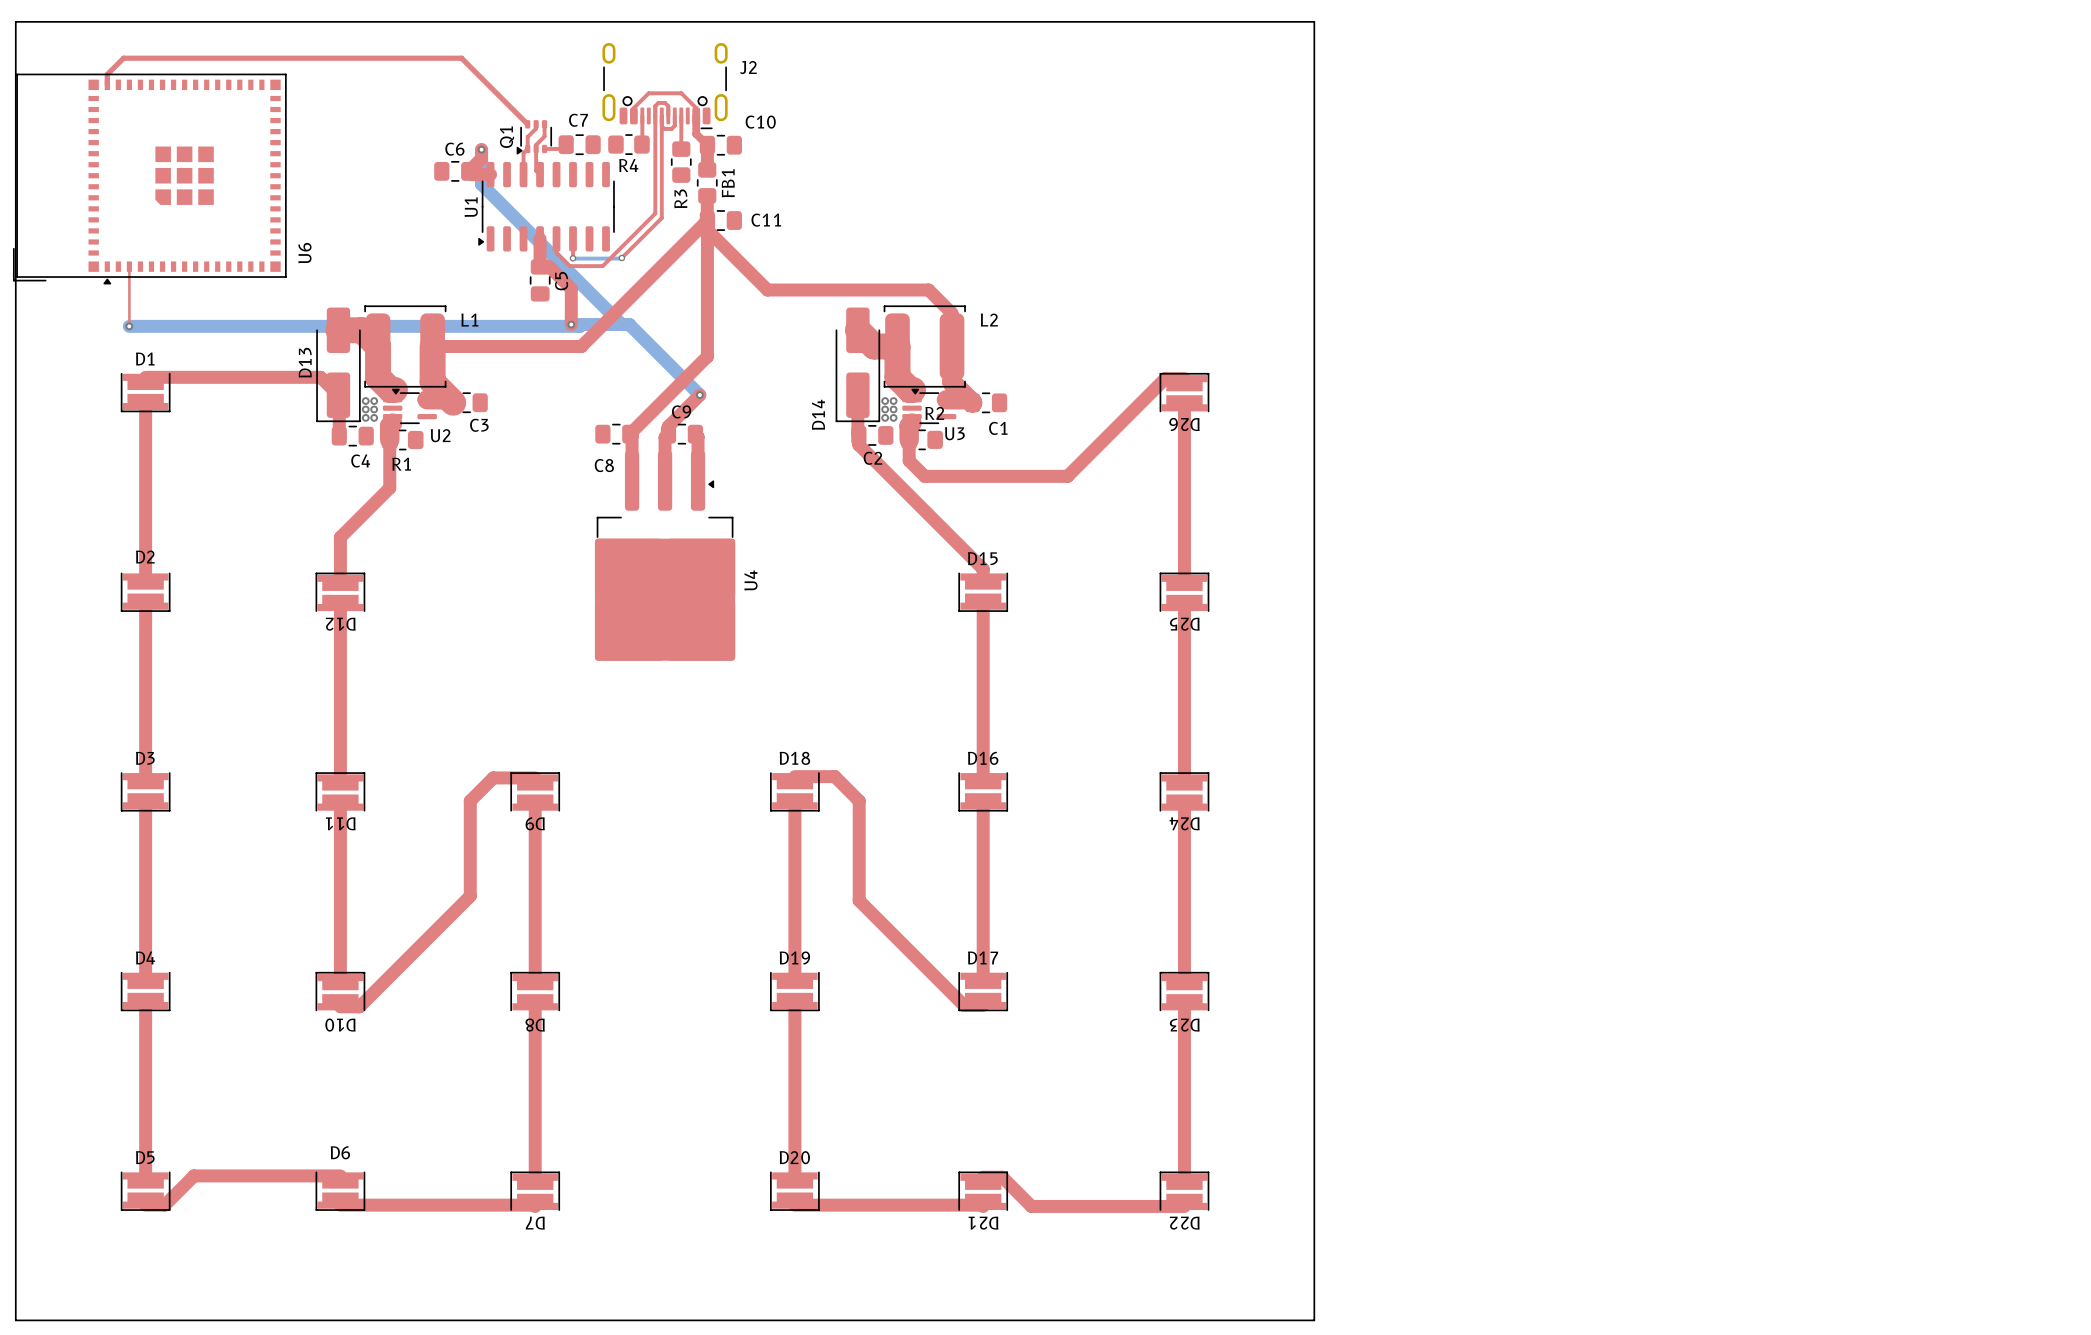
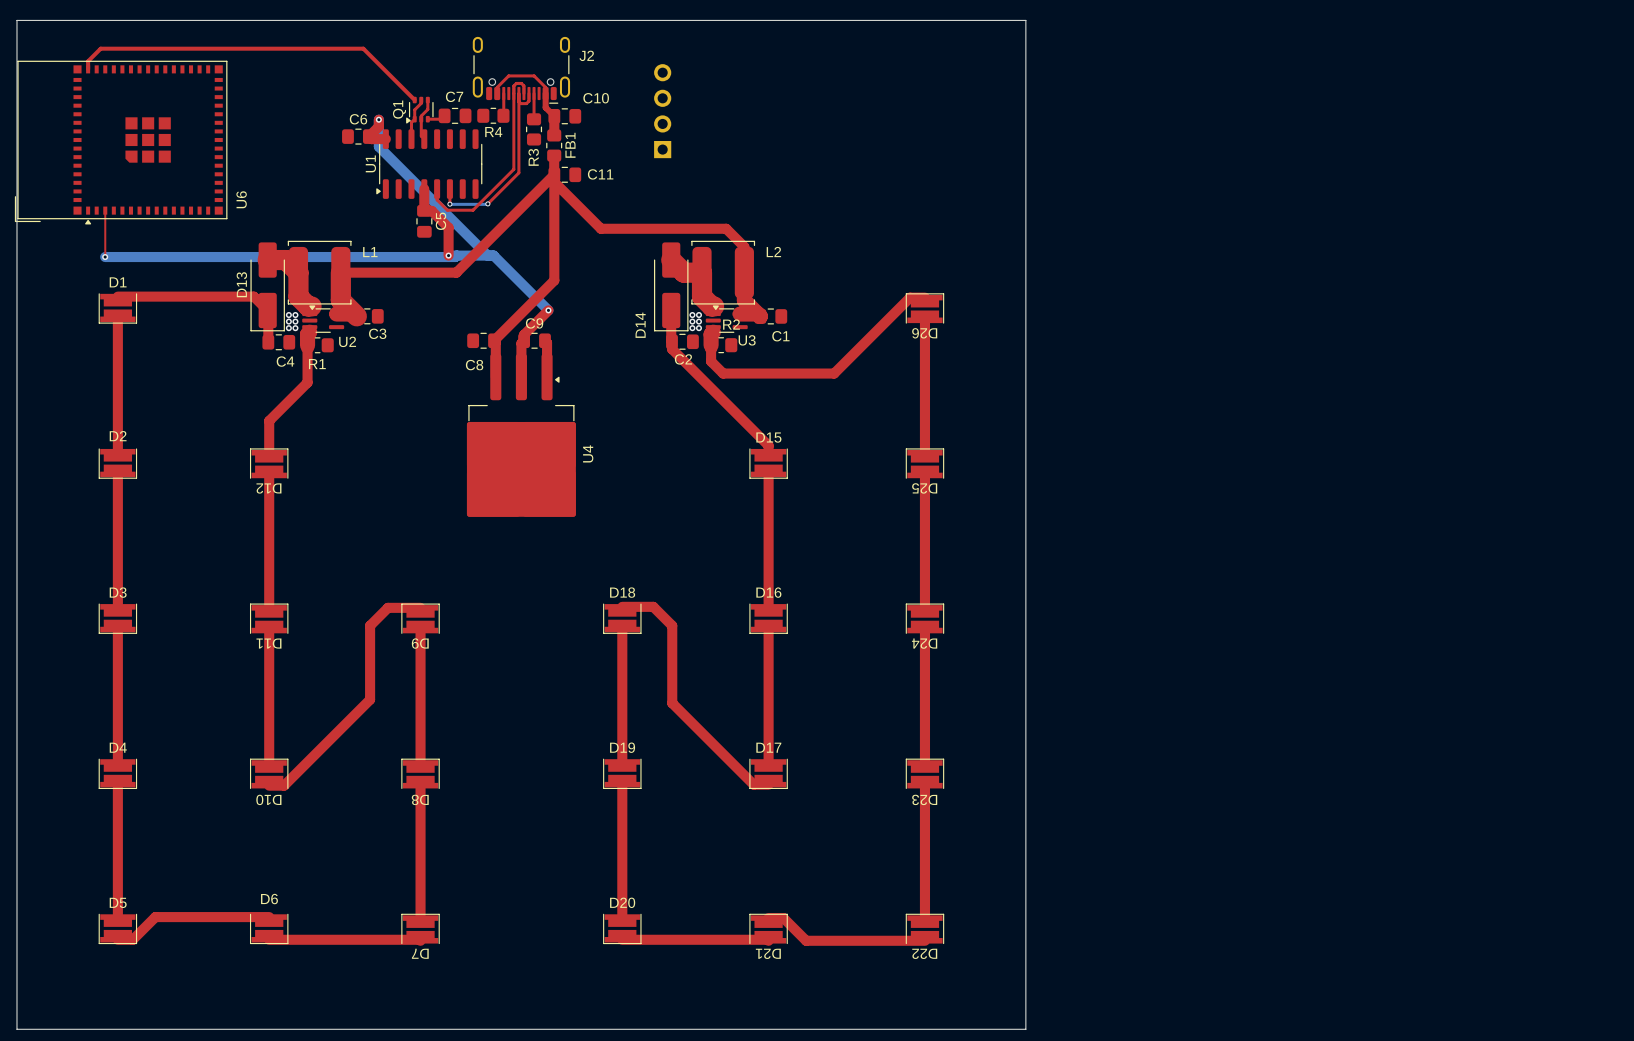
part: none -> (662, 111)

